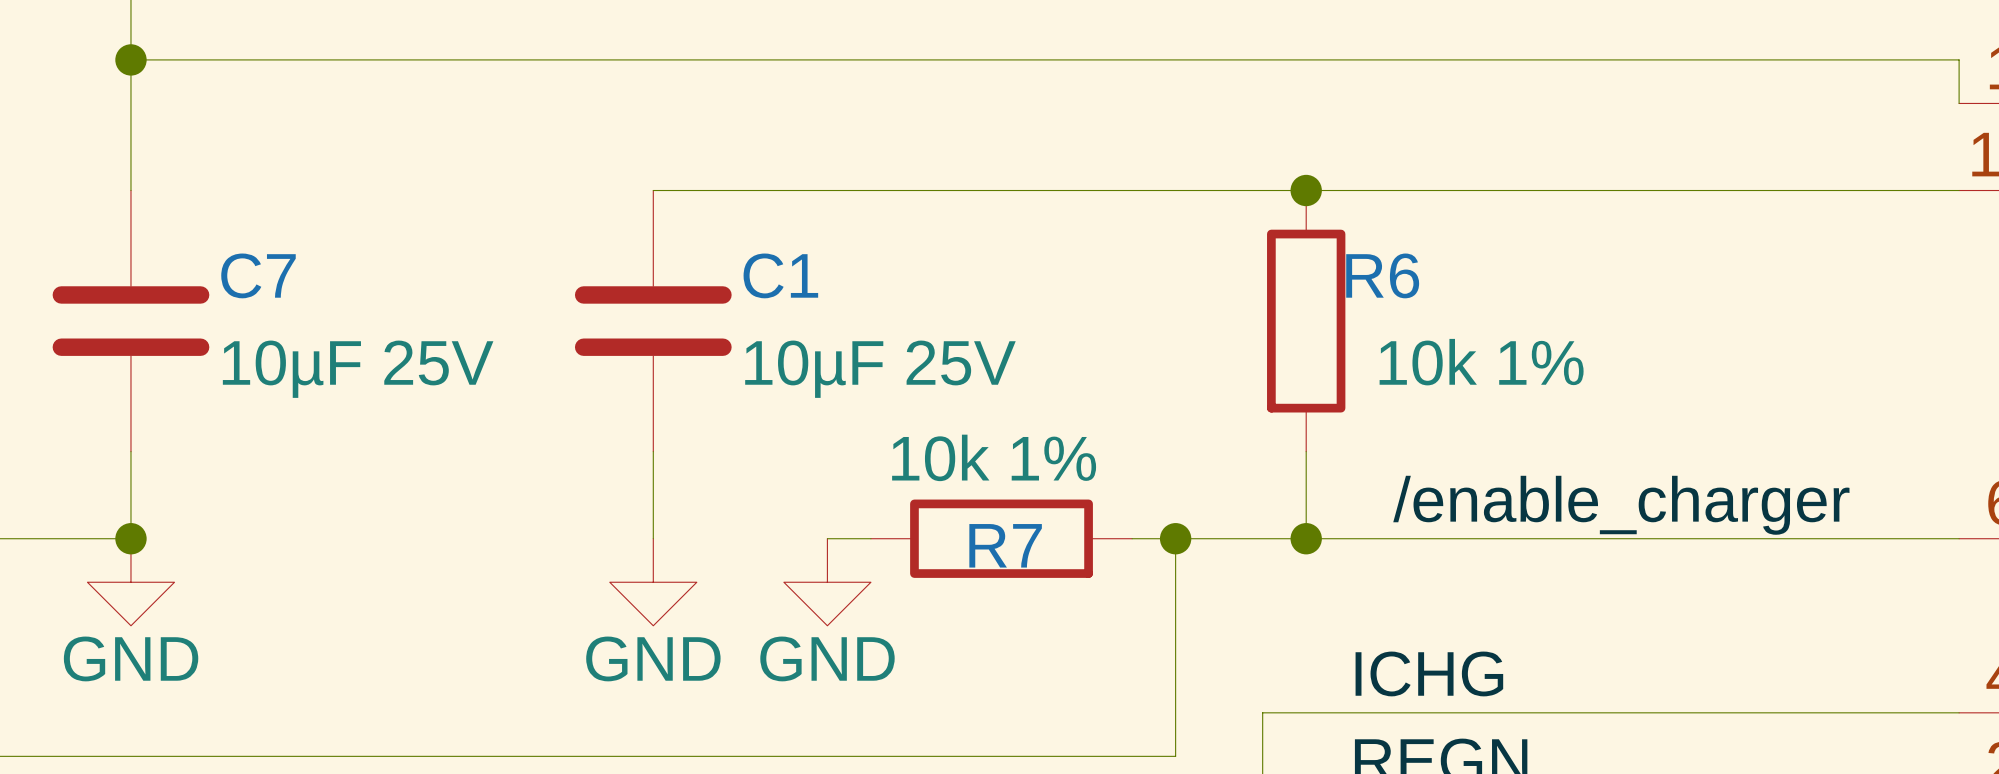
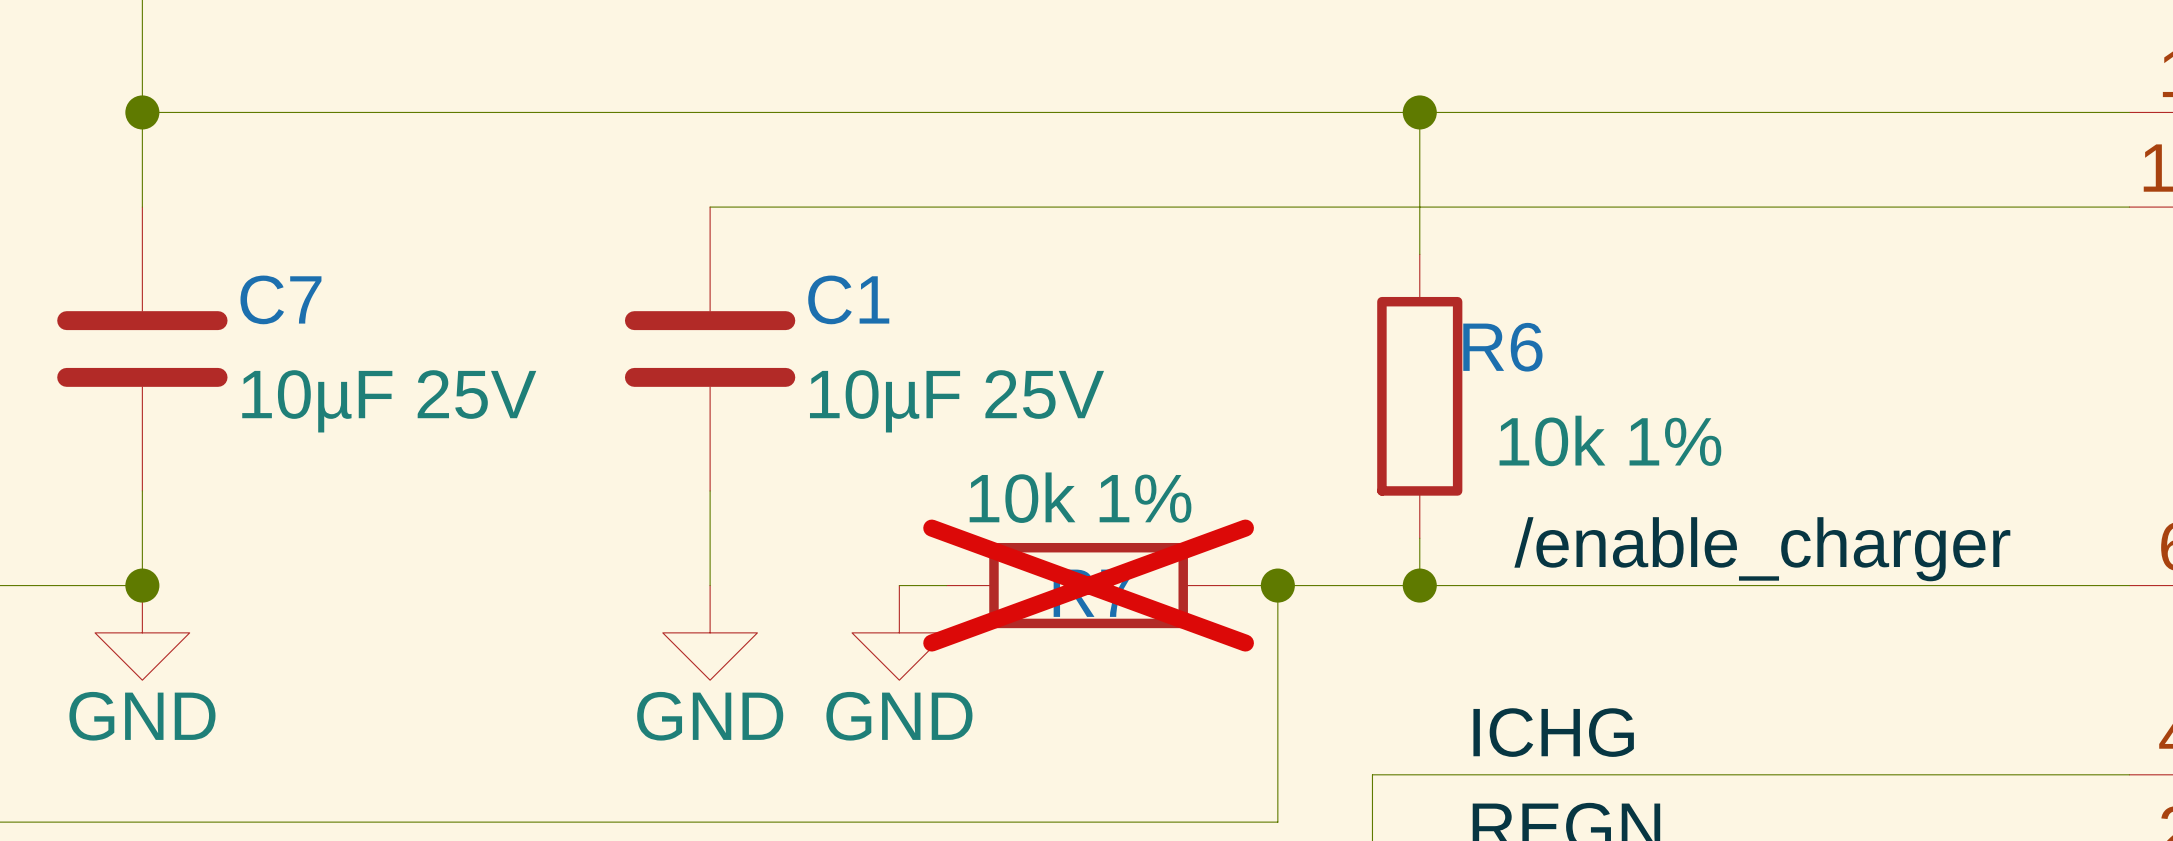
wire: (130, 59) (1959, 59) (1959, 103) -> (142, 112) (2129, 112)
junction position: (130, 59) -> (142, 112)
wire: none -> (1419, 112) (1419, 254)
junction position: (1306, 190) -> (1419, 112)
R6 position: (1306, 321) -> (1419, 396)
R7 do-not-place cross: none -> (1088, 585)

